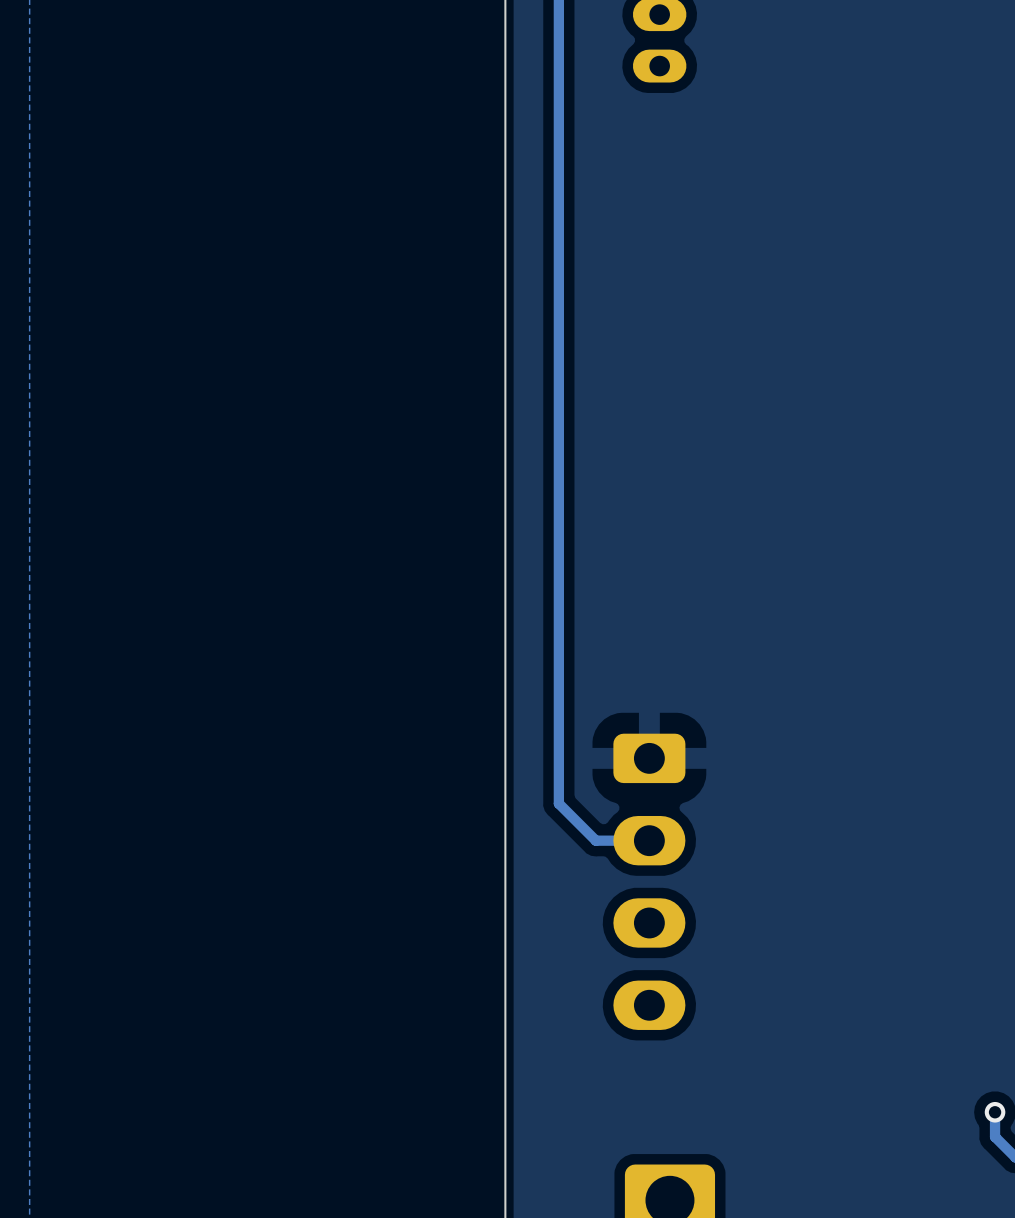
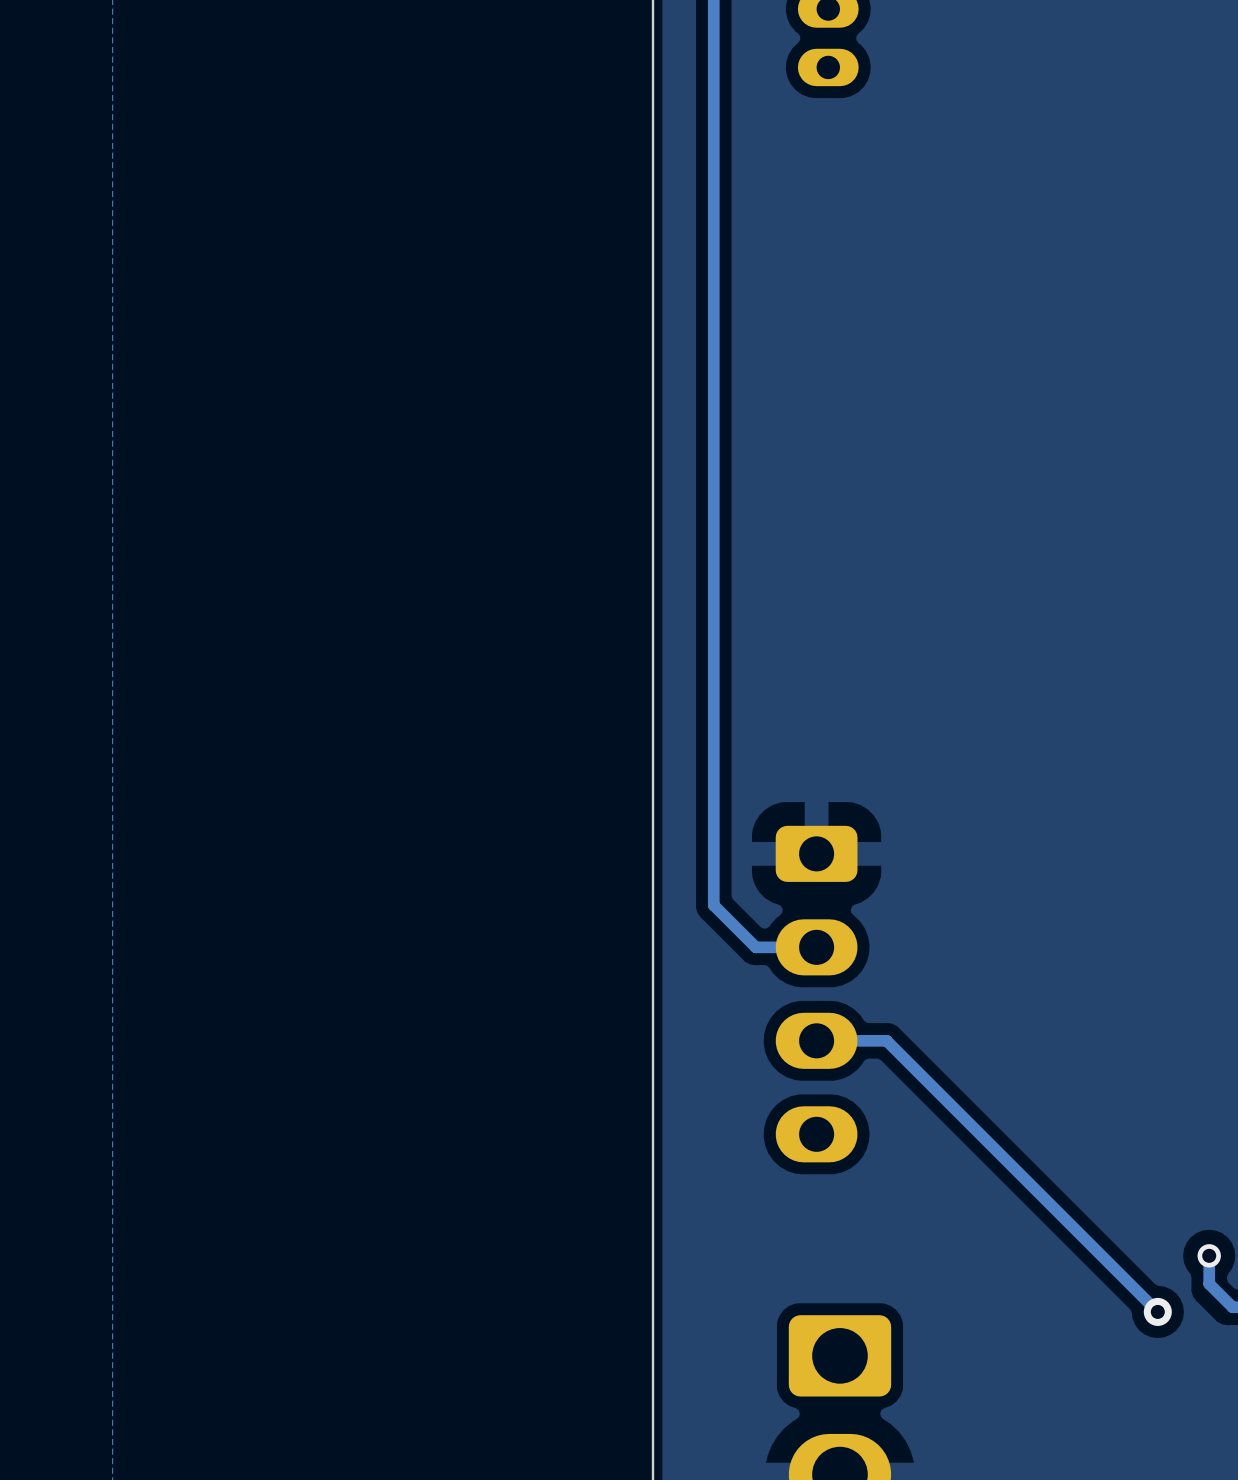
track: none -> (816, 1040) (886, 1040) (1157, 1311)
via: none -> (1157, 1311)

